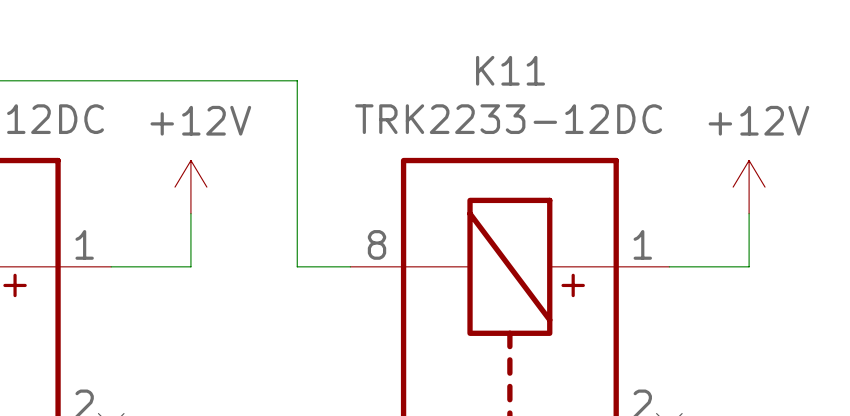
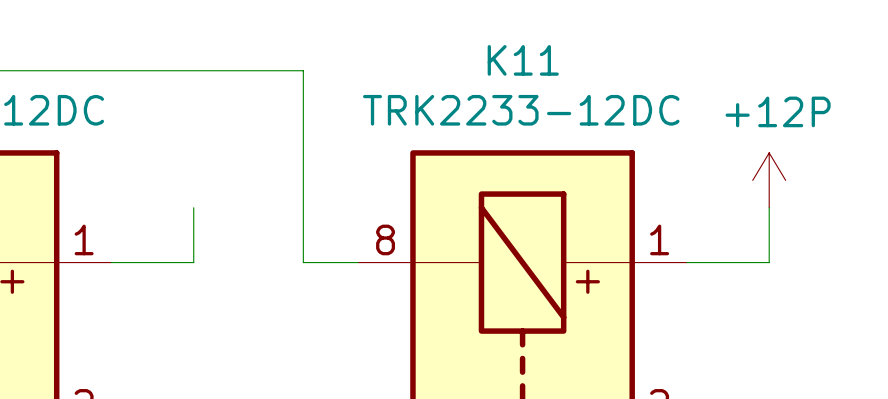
power symbol: +12V (190, 187) -> none
power symbol: +12V (749, 187) -> +12P (769, 180)

